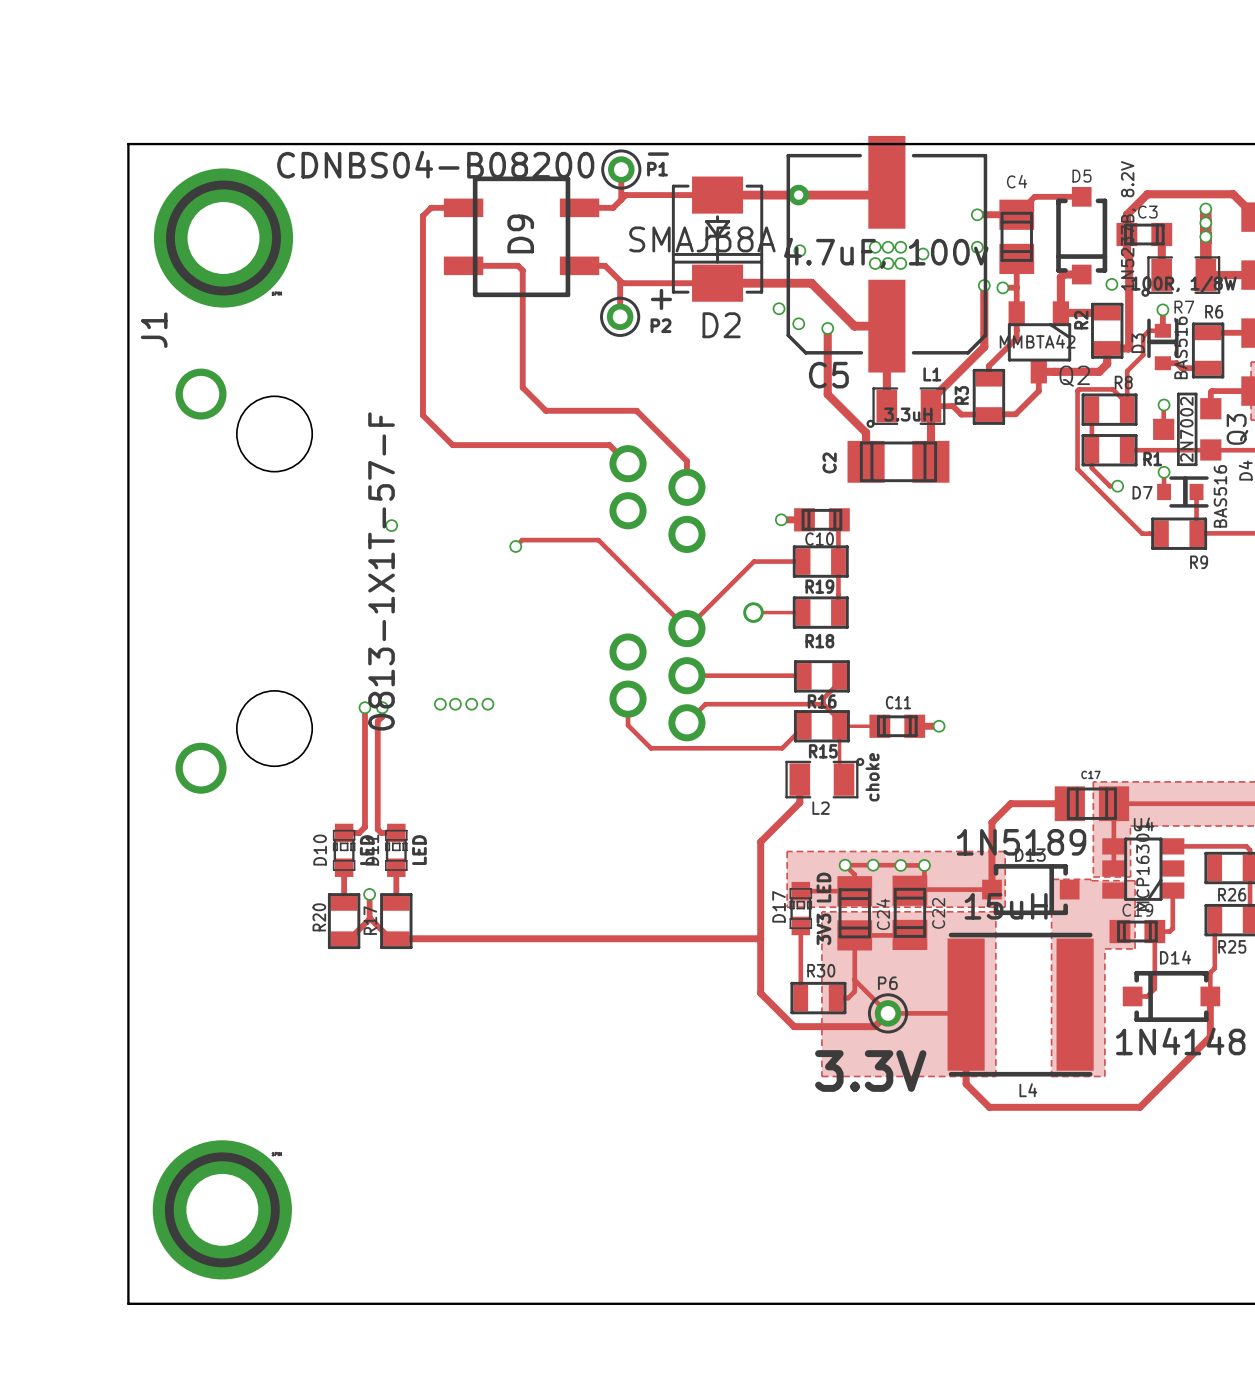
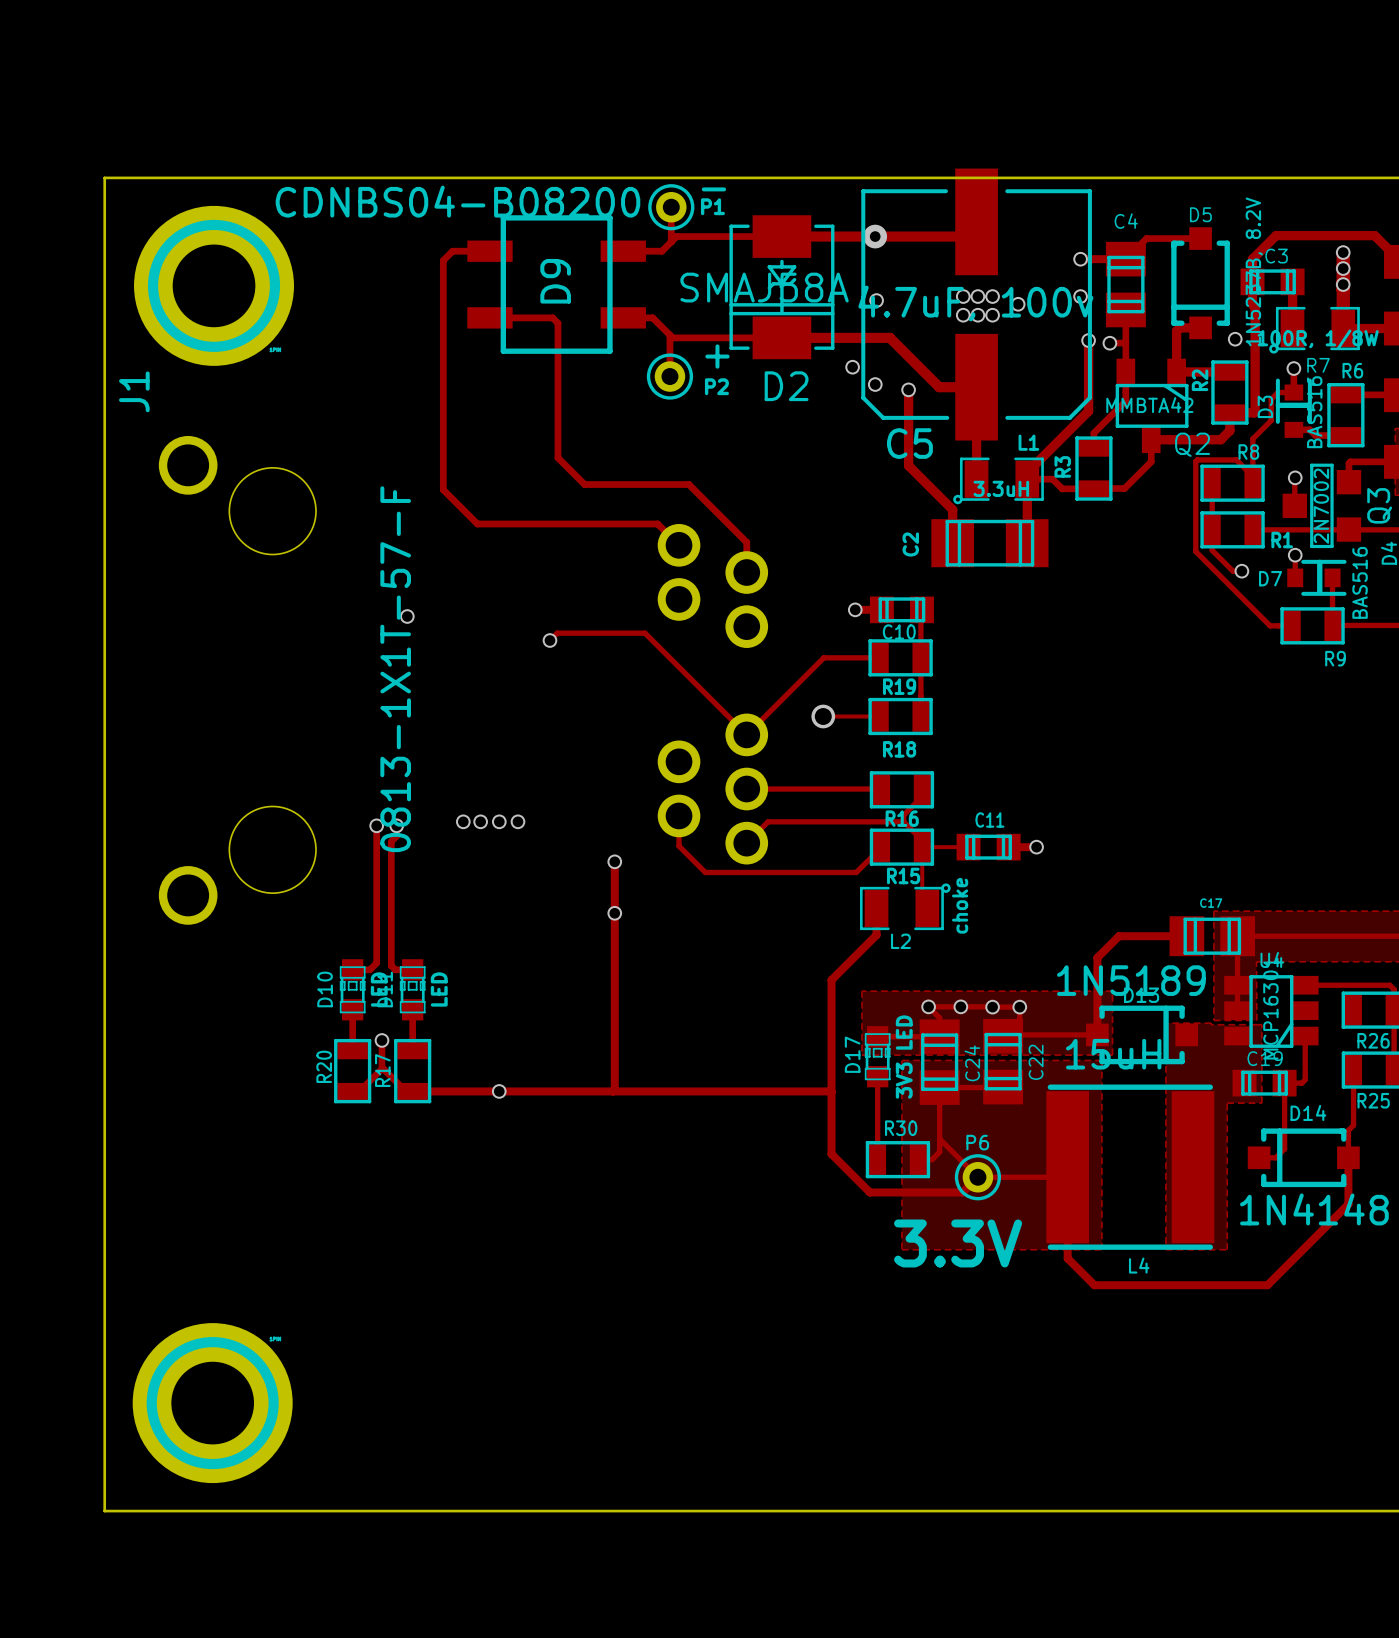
track: none -> (614, 861) (614, 1089) (612, 1091)
via: none -> (614, 861)
via: none -> (614, 913)
via: none -> (499, 1091)

